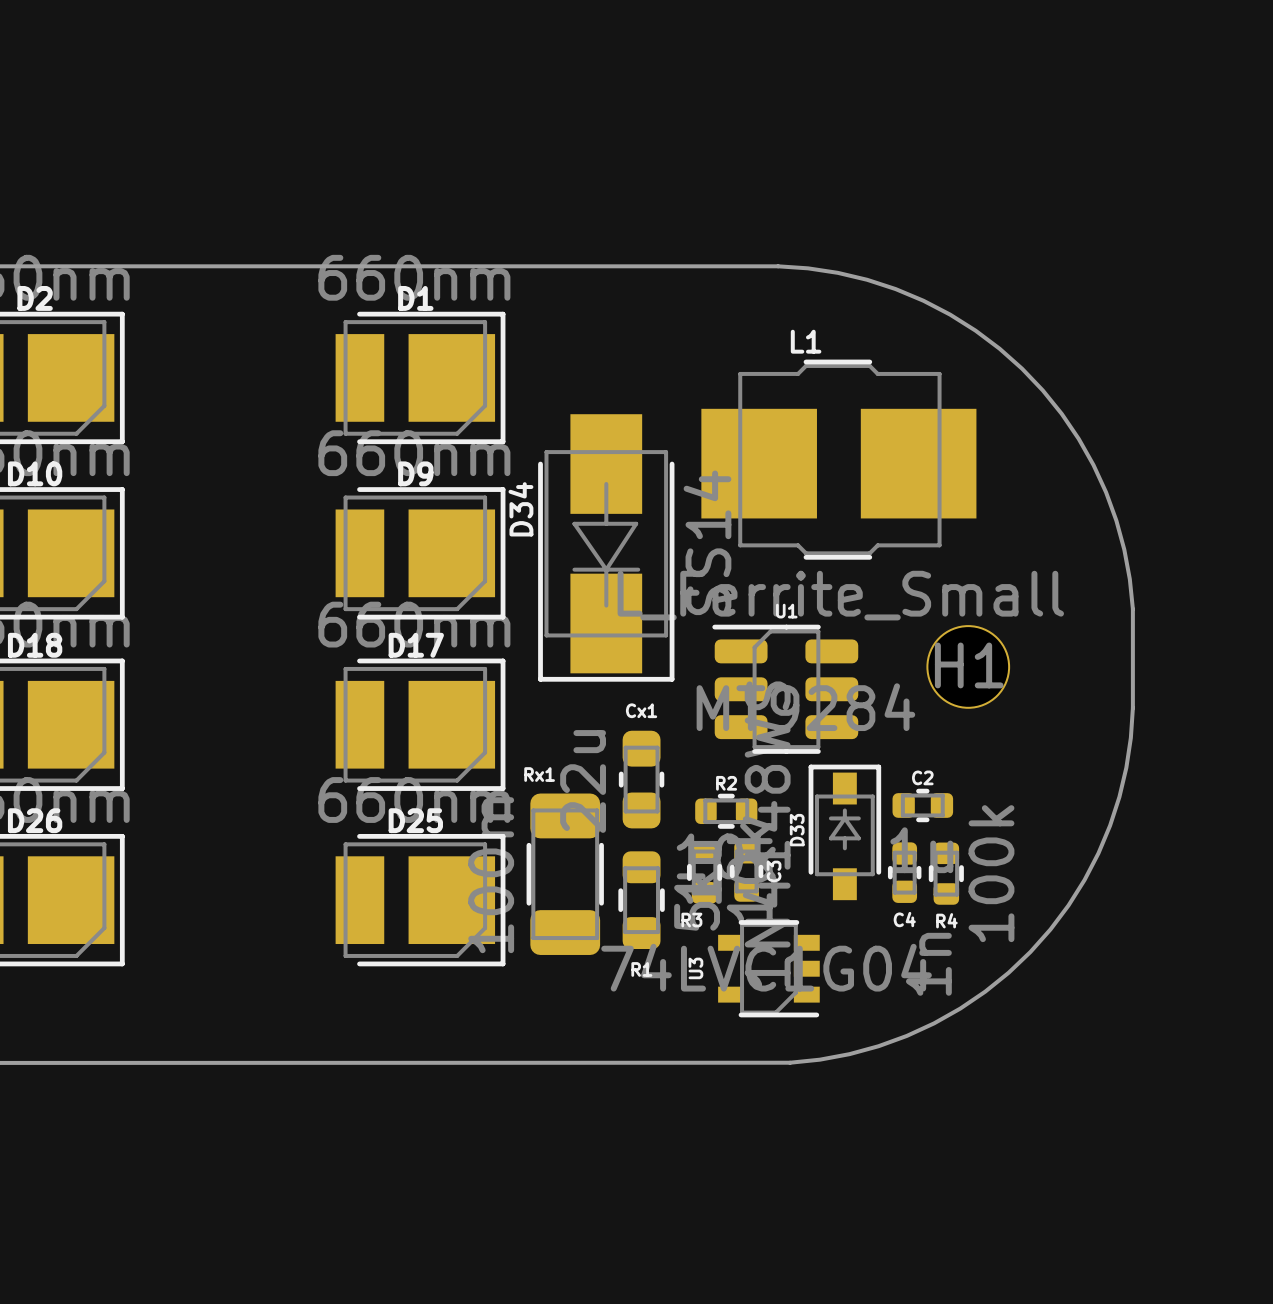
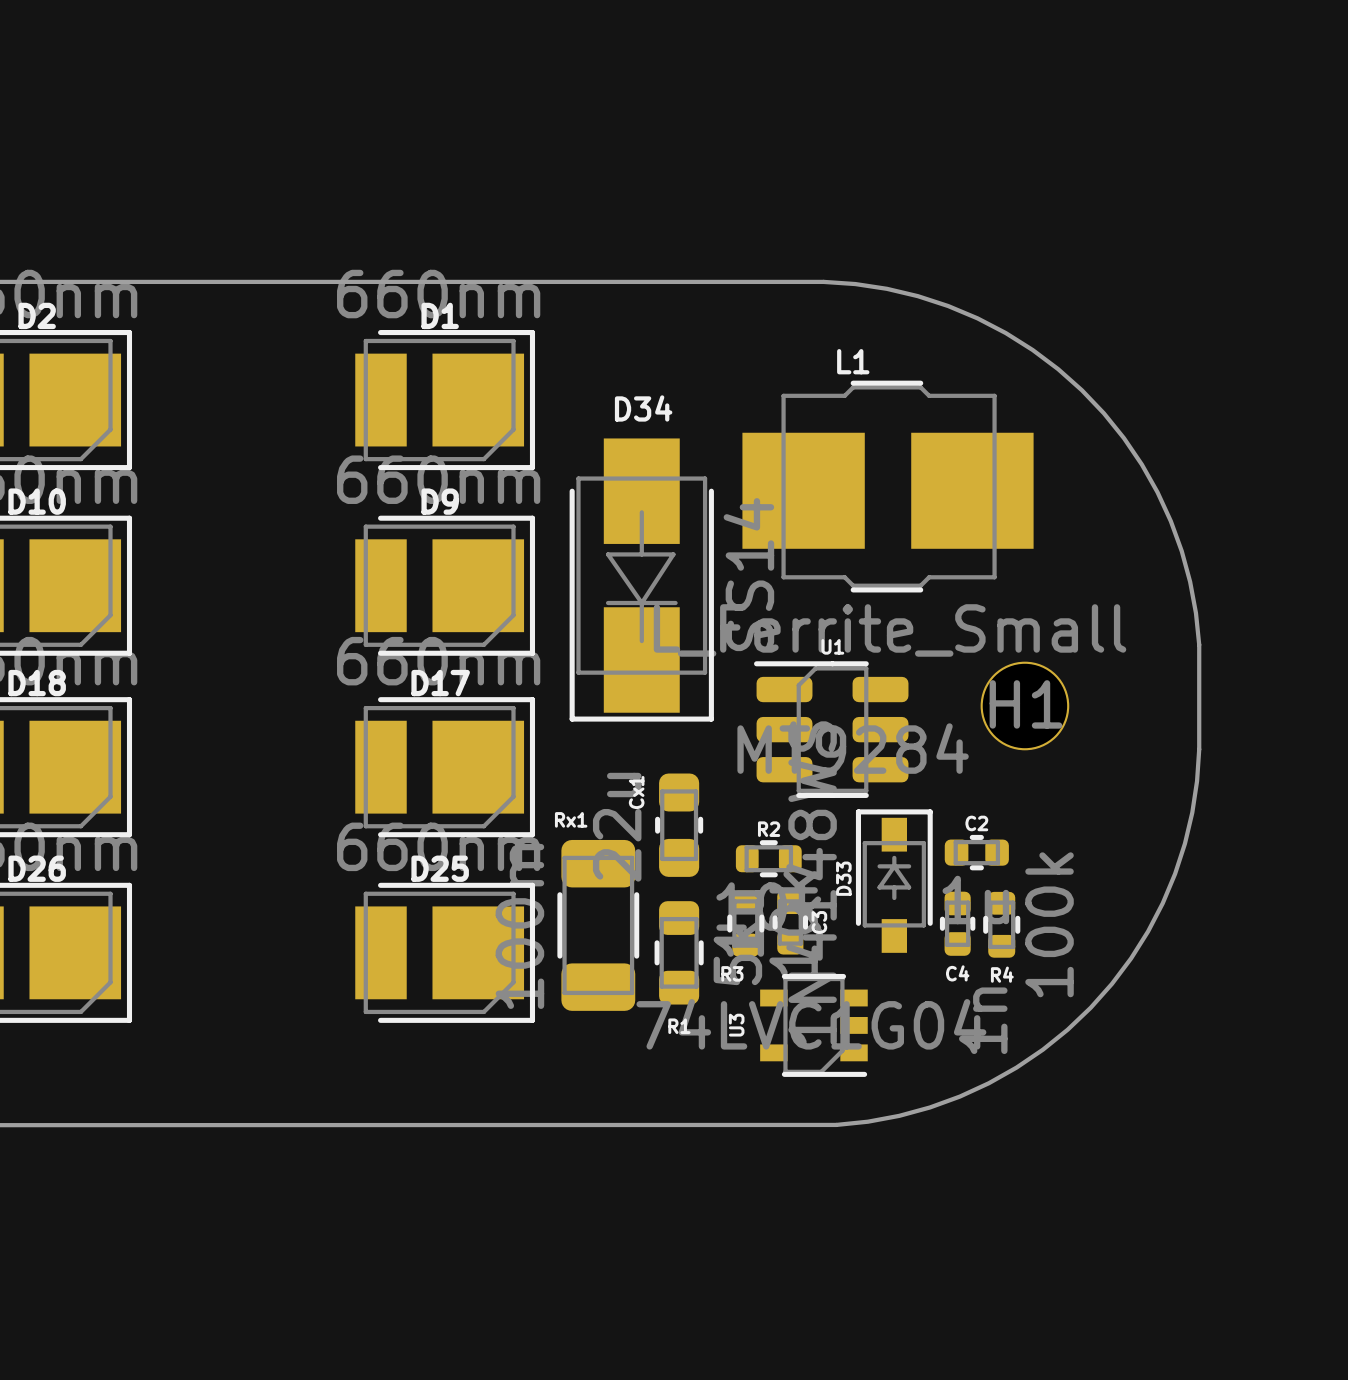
D34 name rotation: 0° (520, 509) -> 90° clockwise (643, 408)
D34 name position: D34 (520, 509) -> D34 (643, 408)
Cx1 name rotation: 0° (641, 710) -> 90° counterclockwise (636, 792)
Cx1 name position: Cx1 (641, 710) -> Cx1 (636, 792)

